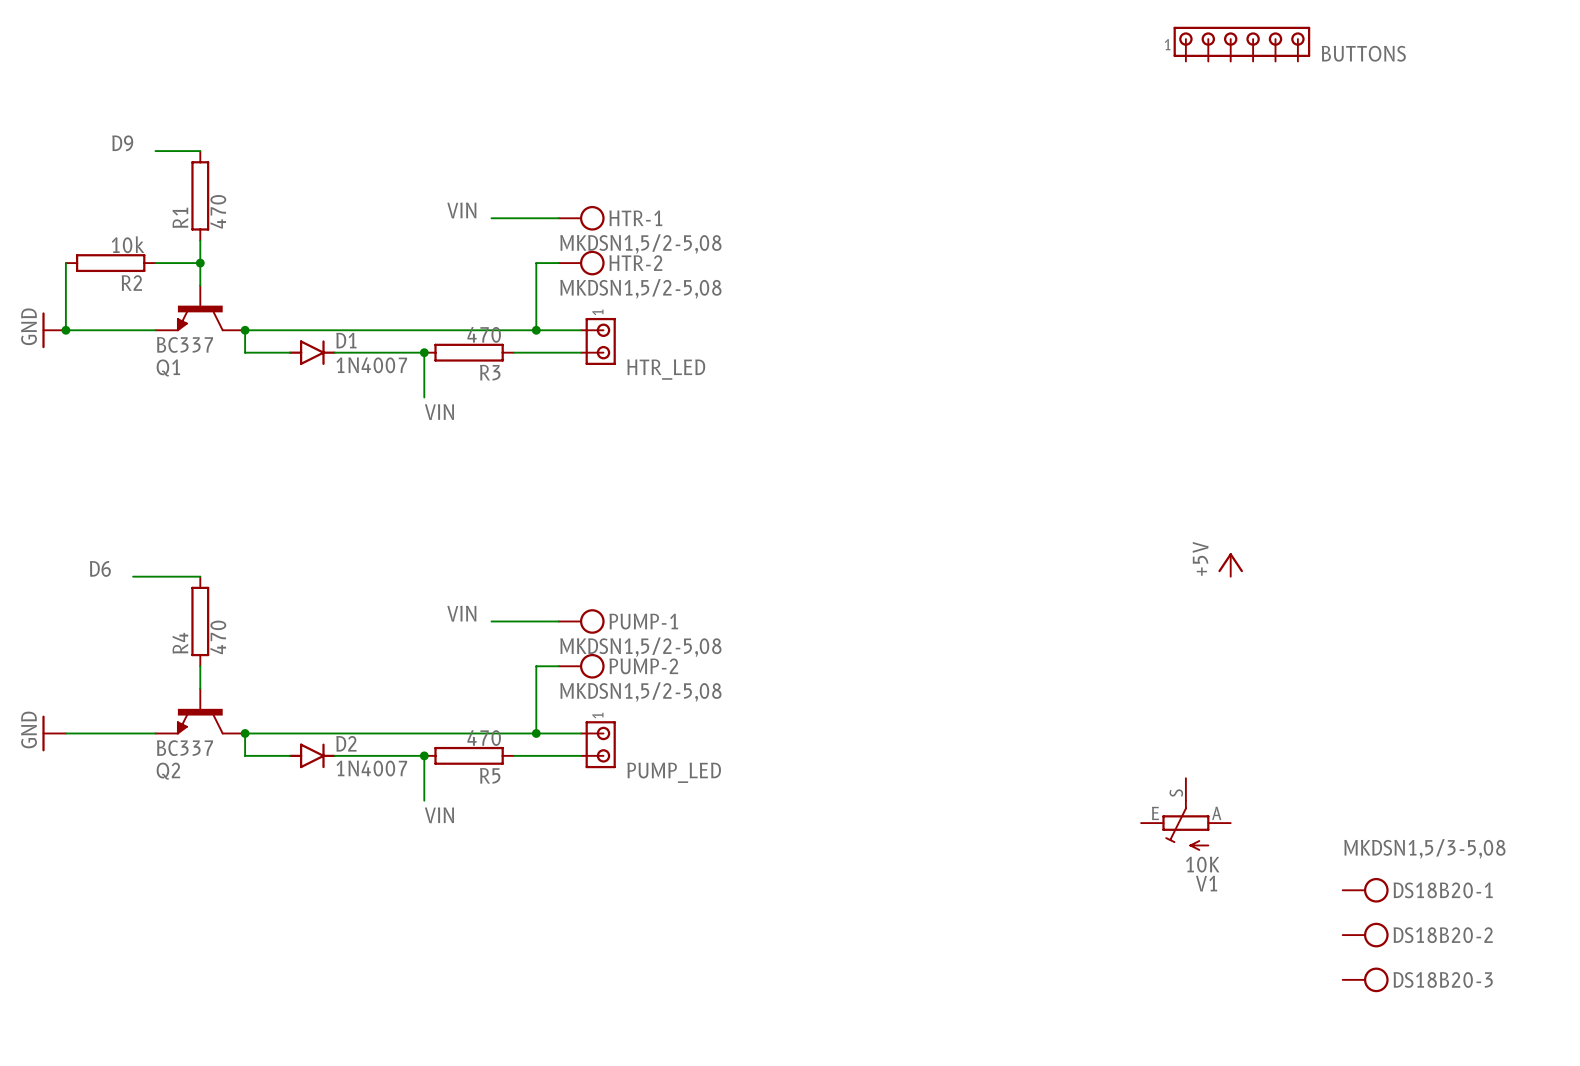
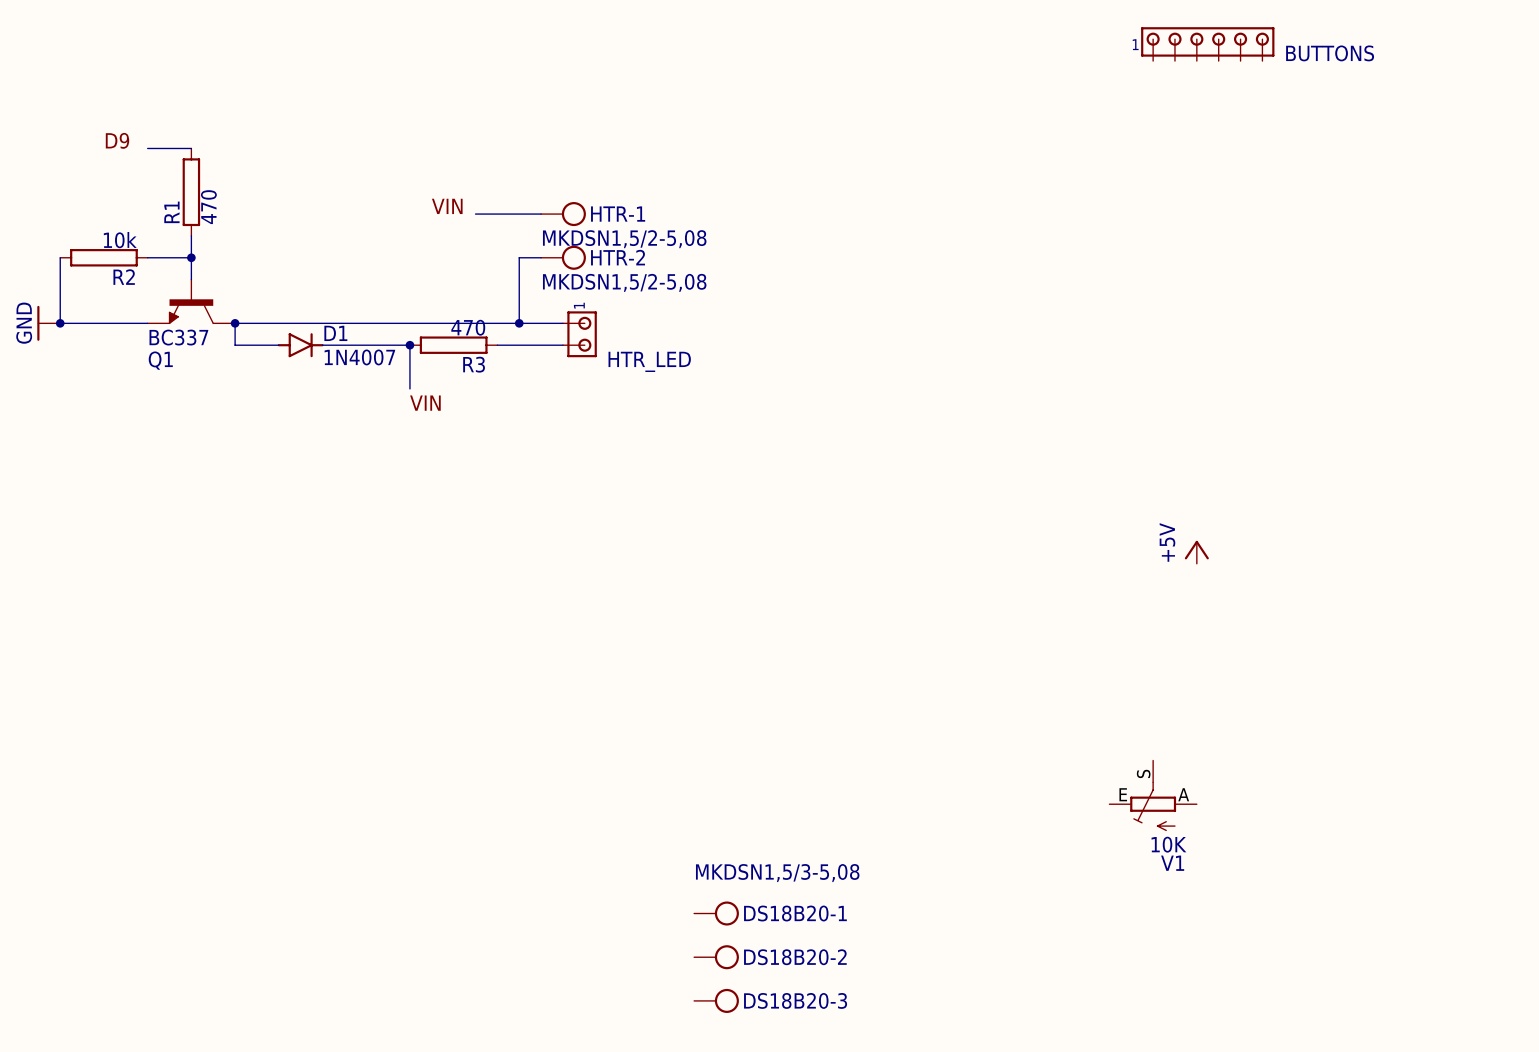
label: D6 (100, 568) -> none
wire: (133, 576) (200, 576) -> none
label: VIN (461, 613) -> none
R4: 470 (200, 621) -> none
wire: (491, 621) (558, 621) -> none
PUMP-1: MKDSN1,5/2-5,08 (581, 621) -> none
wire: (200, 666) (200, 688) -> none
wire: (558, 666) (536, 666) (536, 733) -> none
PUMP-2: MKDSN1,5/2-5,08 (581, 666) -> none
Q2: BC337 (200, 711) -> none
power symbol: GND (54, 733) -> none
wire: (65, 733) (155, 733) -> none
junction: (245, 733) -> none
junction: (536, 733) -> none
wire: (581, 733) (245, 733) (245, 755) (289, 755) -> none
PUMP_LED: (598, 744) -> none
D2: 1N4007 (312, 755) -> none
wire: (334, 755) (424, 755) (424, 800) -> none
junction: (424, 755) -> none
R5: 470 (469, 755) -> none
wire: (513, 755) (581, 755) -> none
label: VIN (439, 815) -> none
DS18B20-1 position: (1365, 890) -> (716, 913)
DS18B20-2 position: (1365, 935) -> (716, 957)
DS18B20-3 position: (1365, 979) -> (716, 1000)

